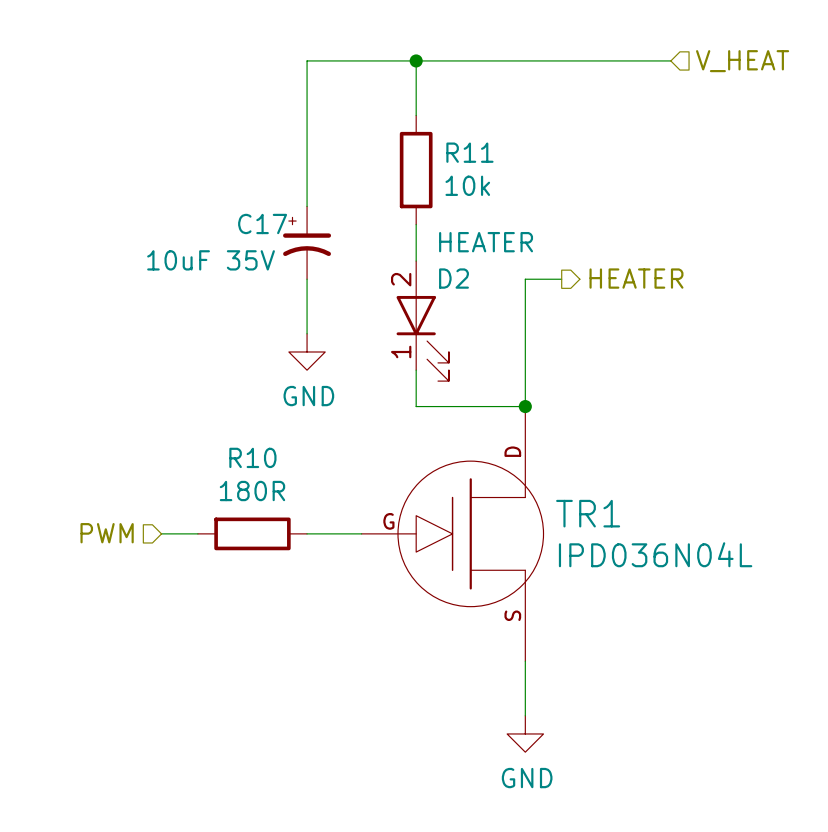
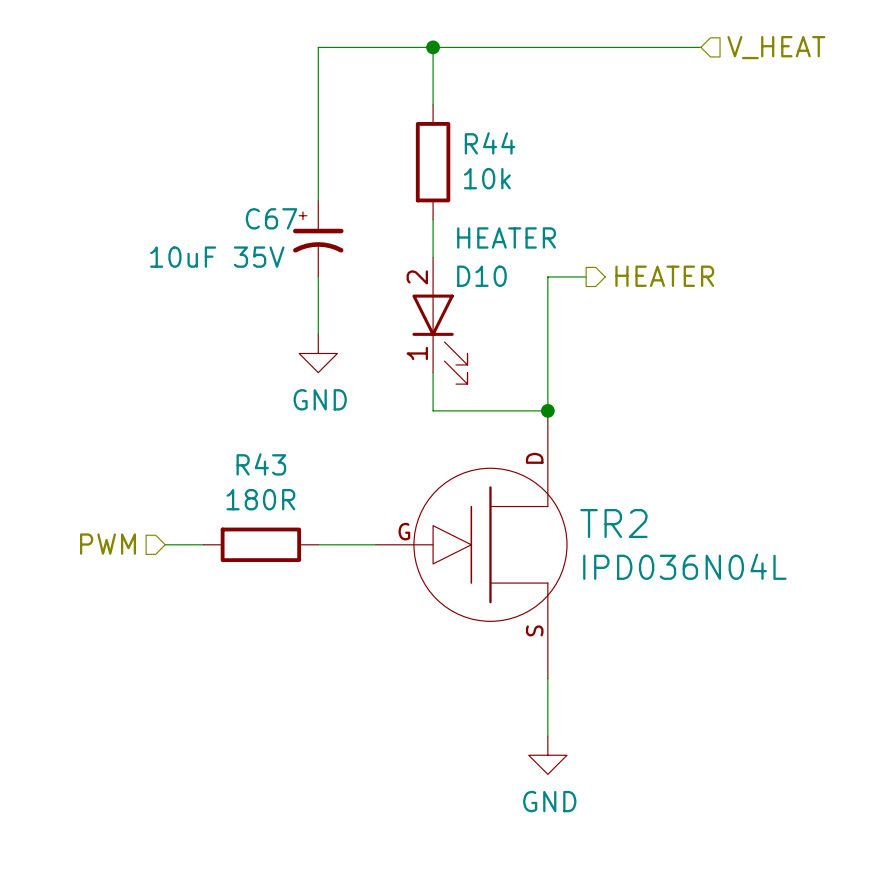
R11 name: R11 (469, 152) -> R44 (490, 143)
C17 name: C17 (262, 223) -> C67 (271, 218)
D2 name: D2 (454, 278) -> D10 (481, 276)
R10 name: R10 (252, 457) -> R43 (261, 464)
TR1 name: TR1 (588, 513) -> TR2 (613, 523)

